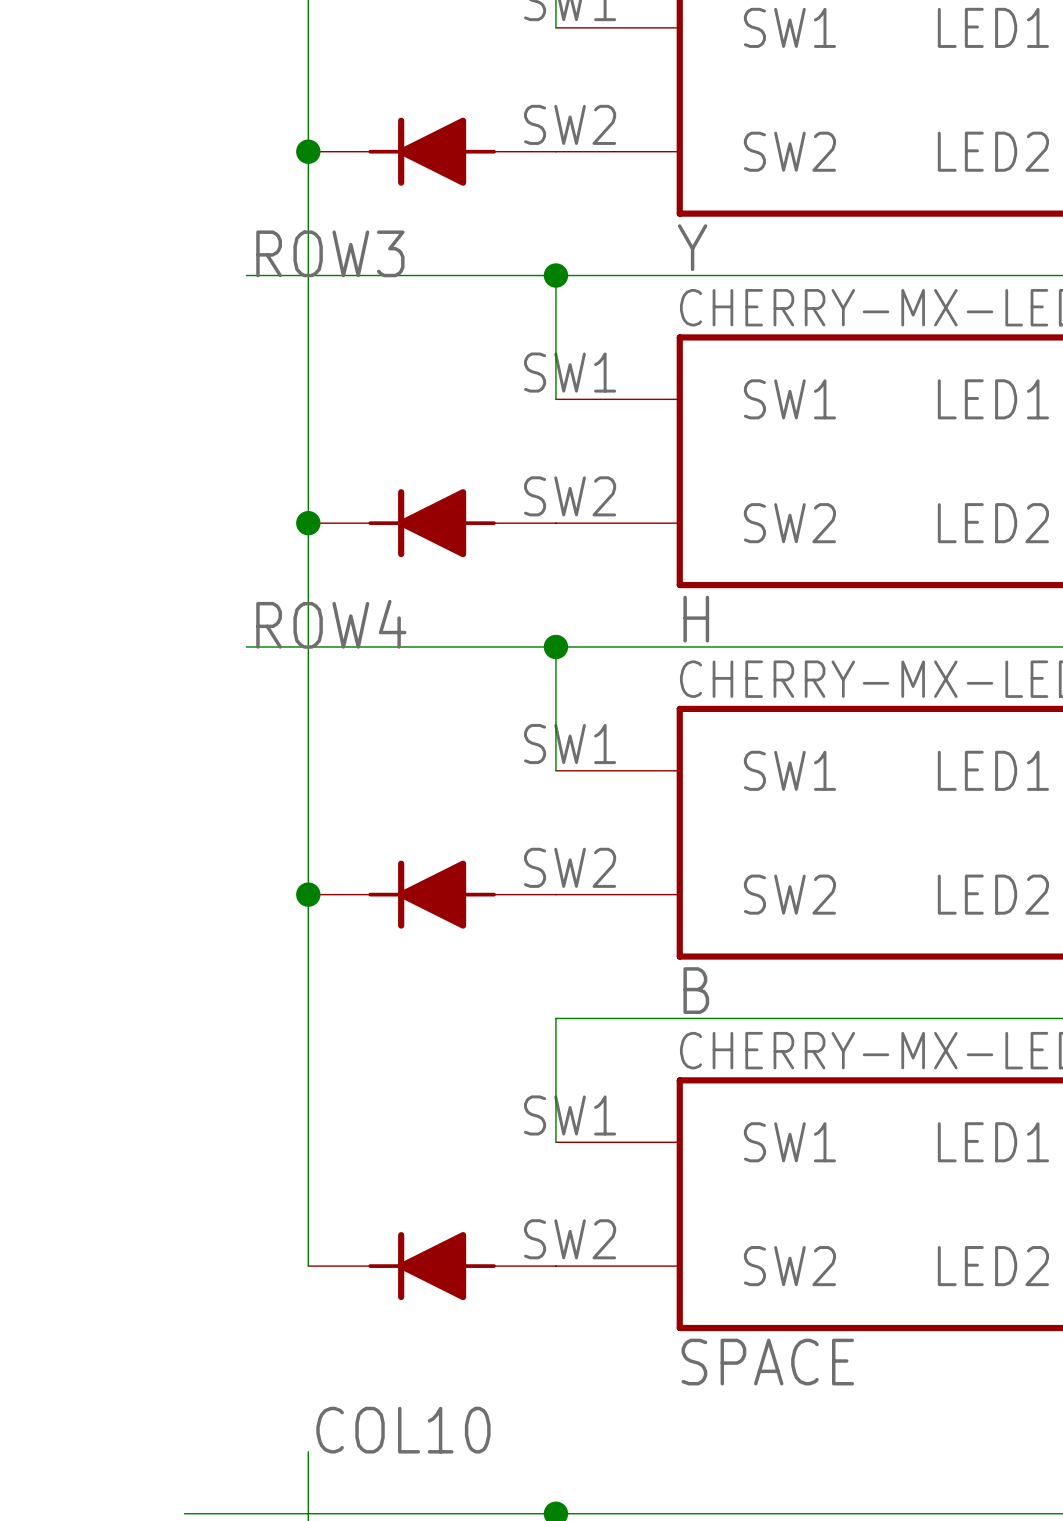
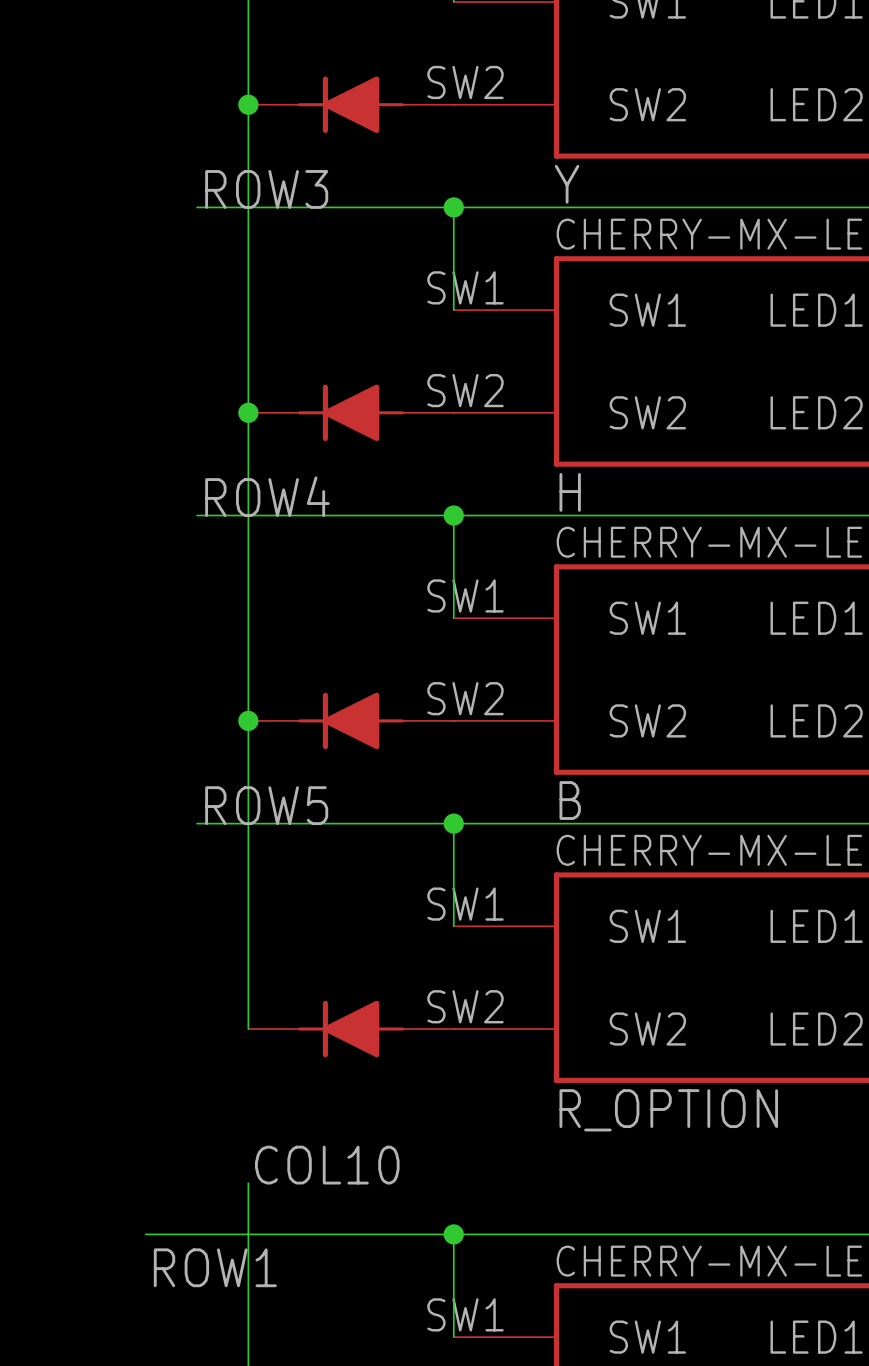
label: none -> ROW5 (266, 805)
wire: none -> (197, 823) (453, 823)
junction: none -> (453, 823)
SPACE name: SPACE (767, 1362) -> R_OPTION (668, 1110)

